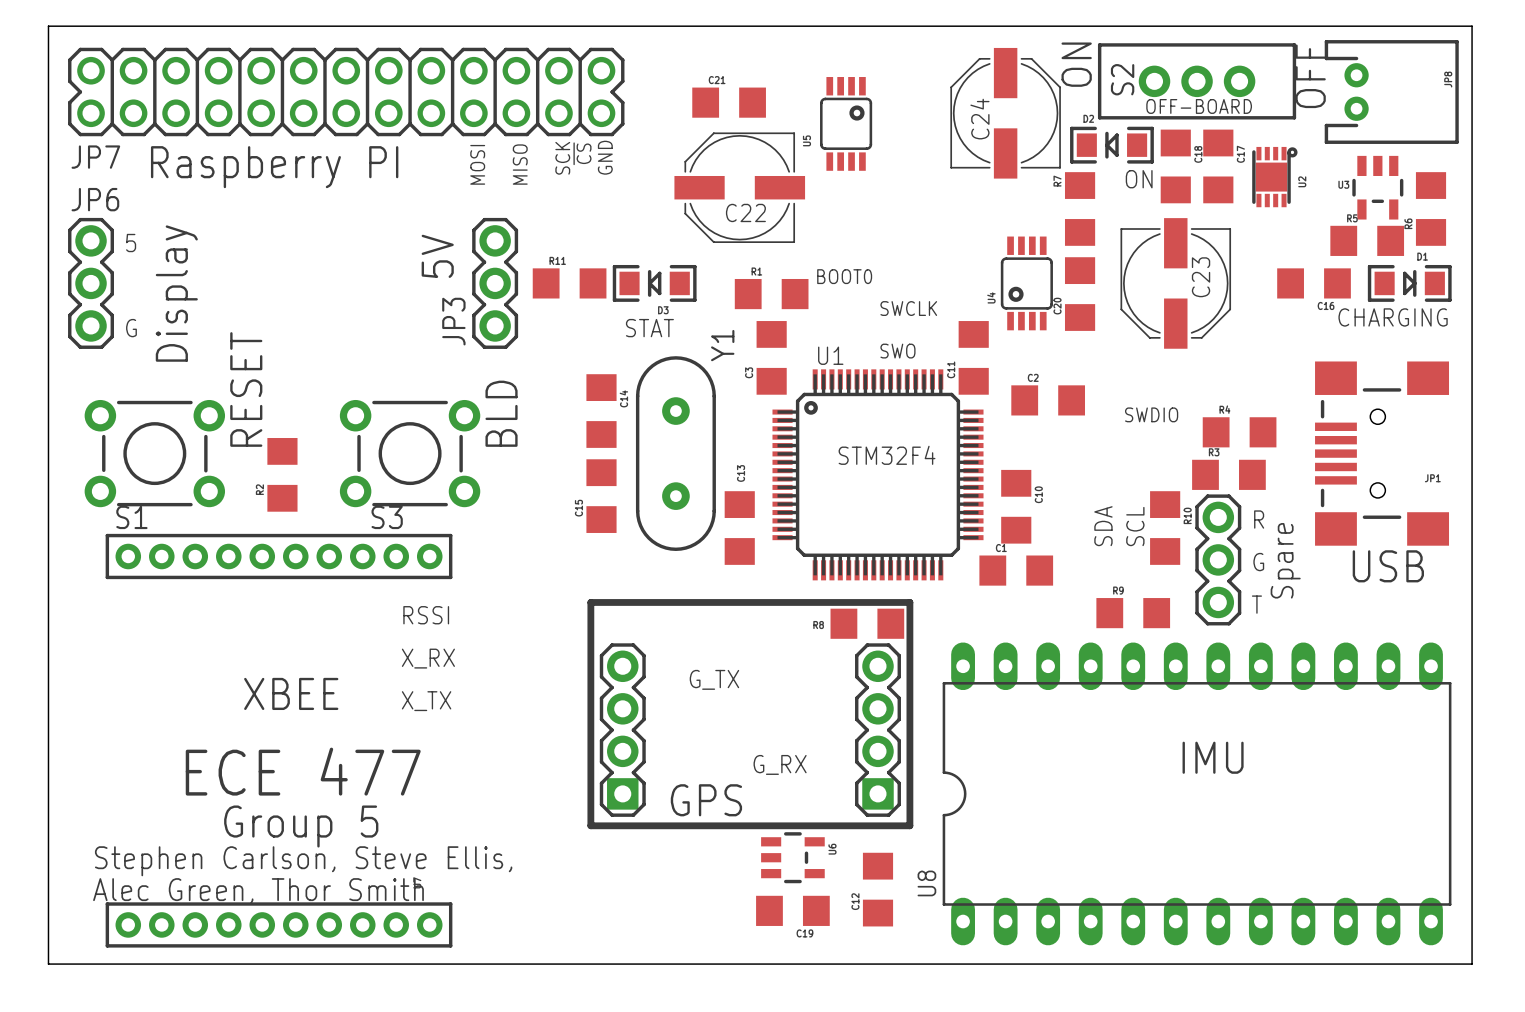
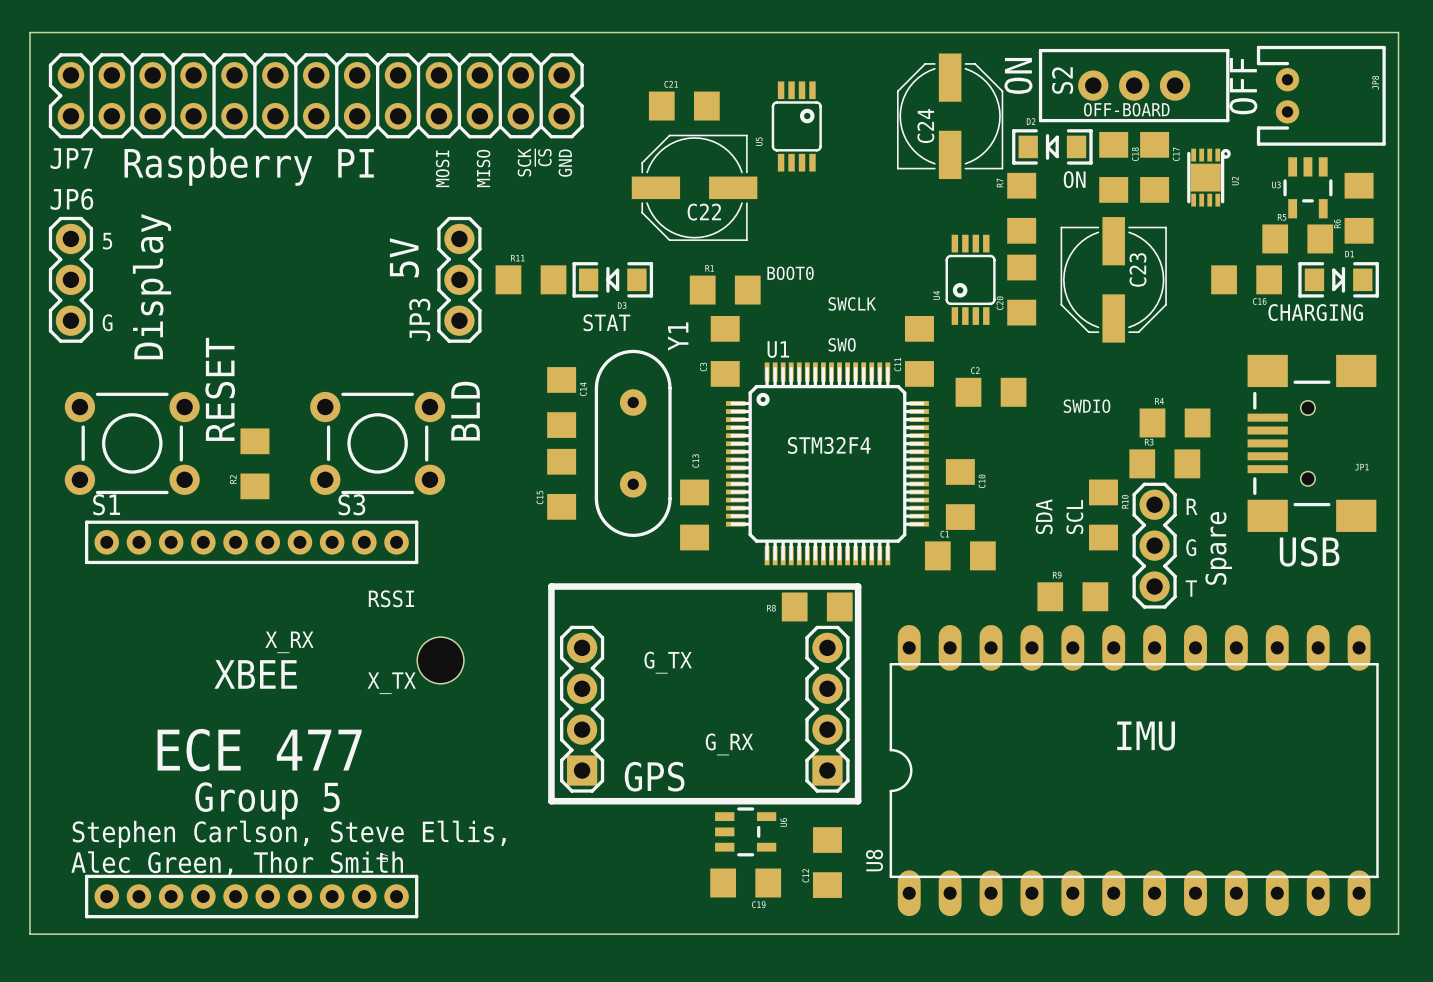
text position: X_RX (428, 658) -> X_RX (289, 642)
hole: none -> (440, 660)

